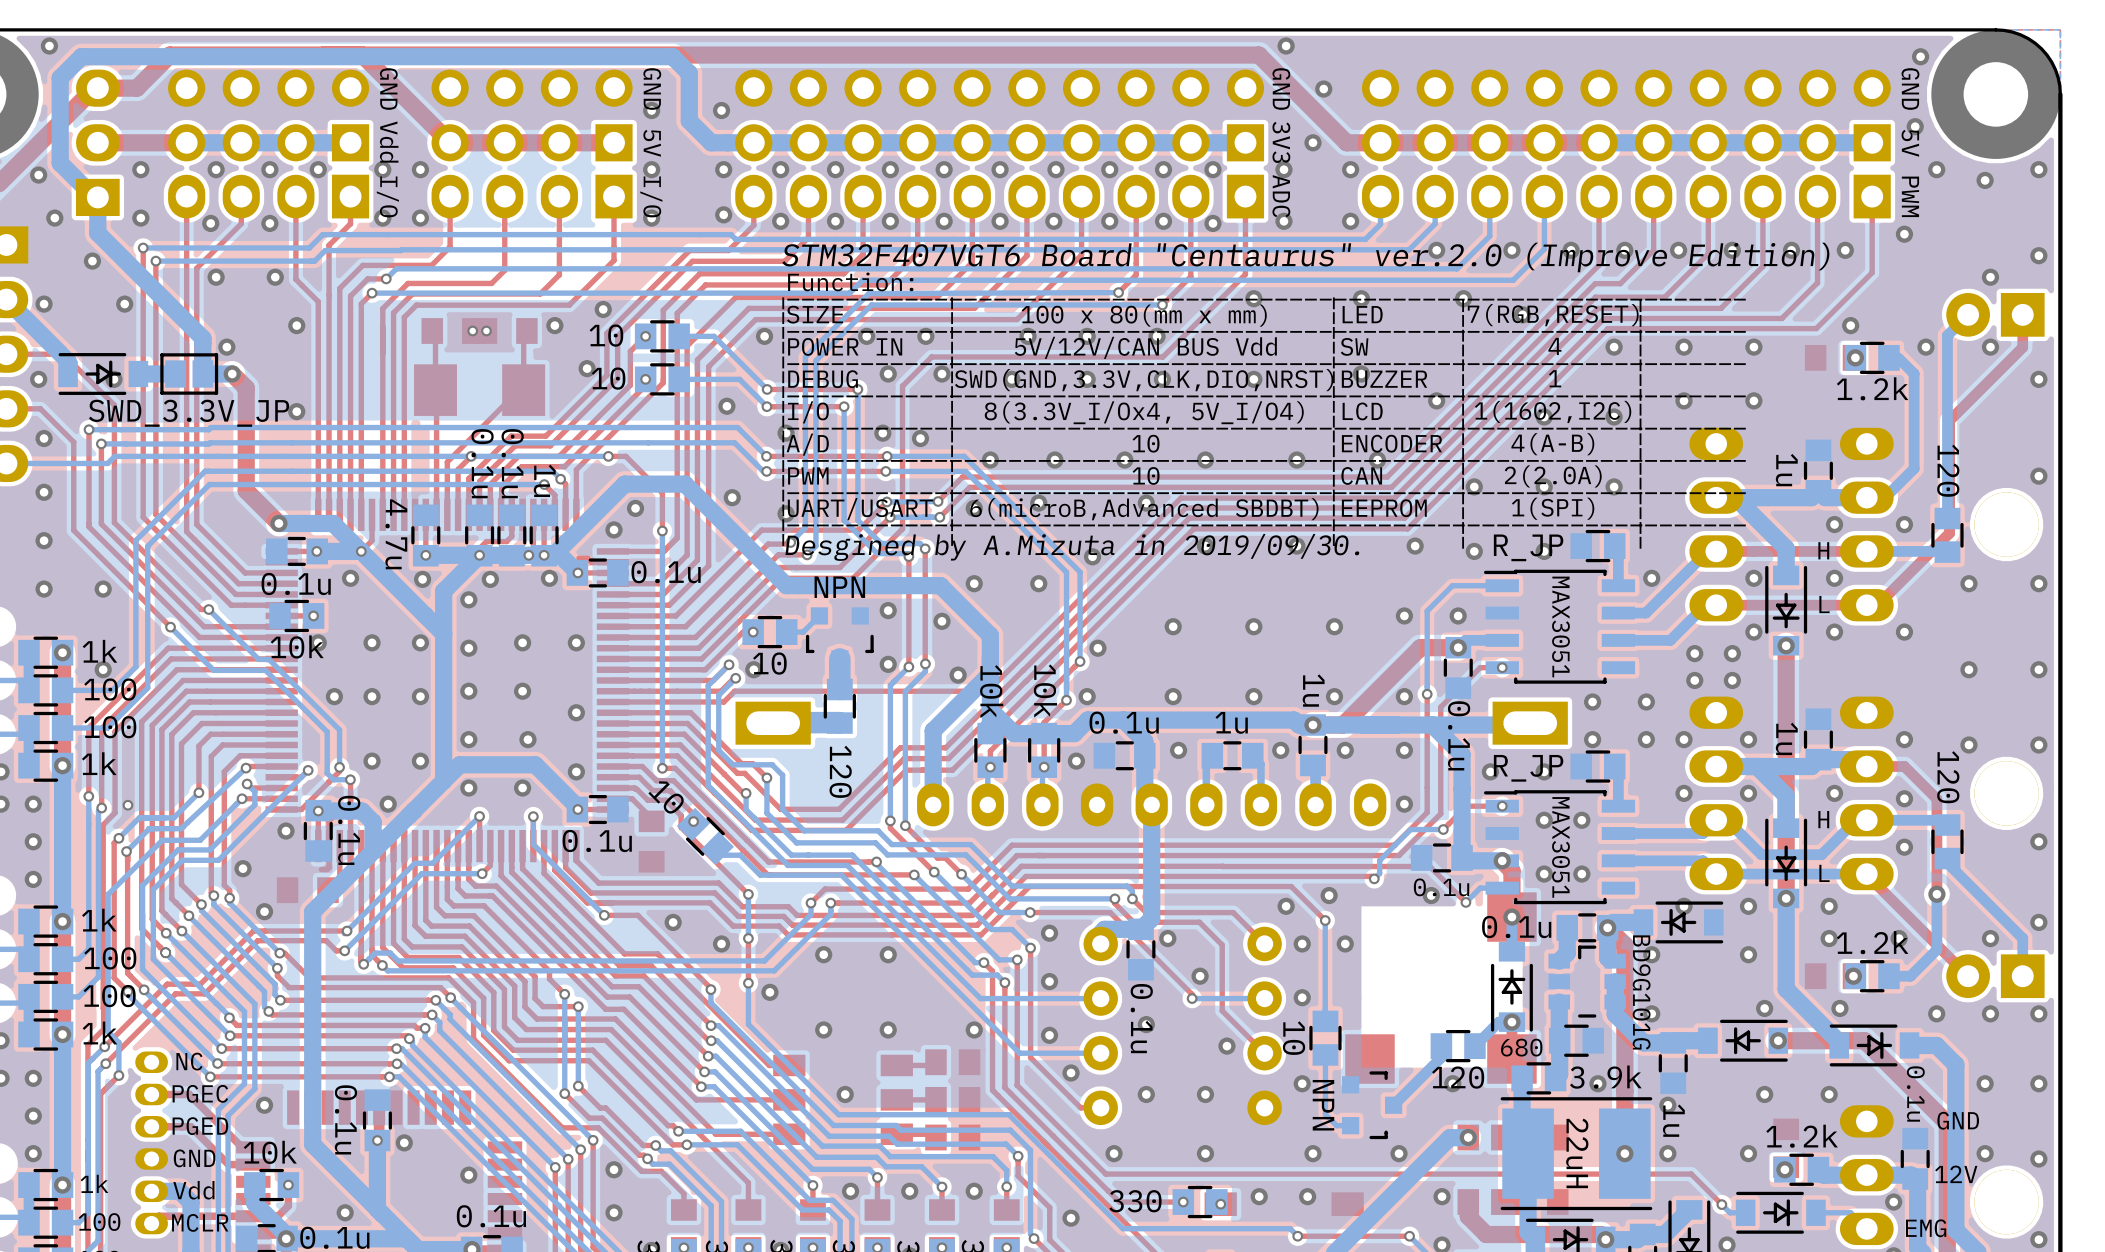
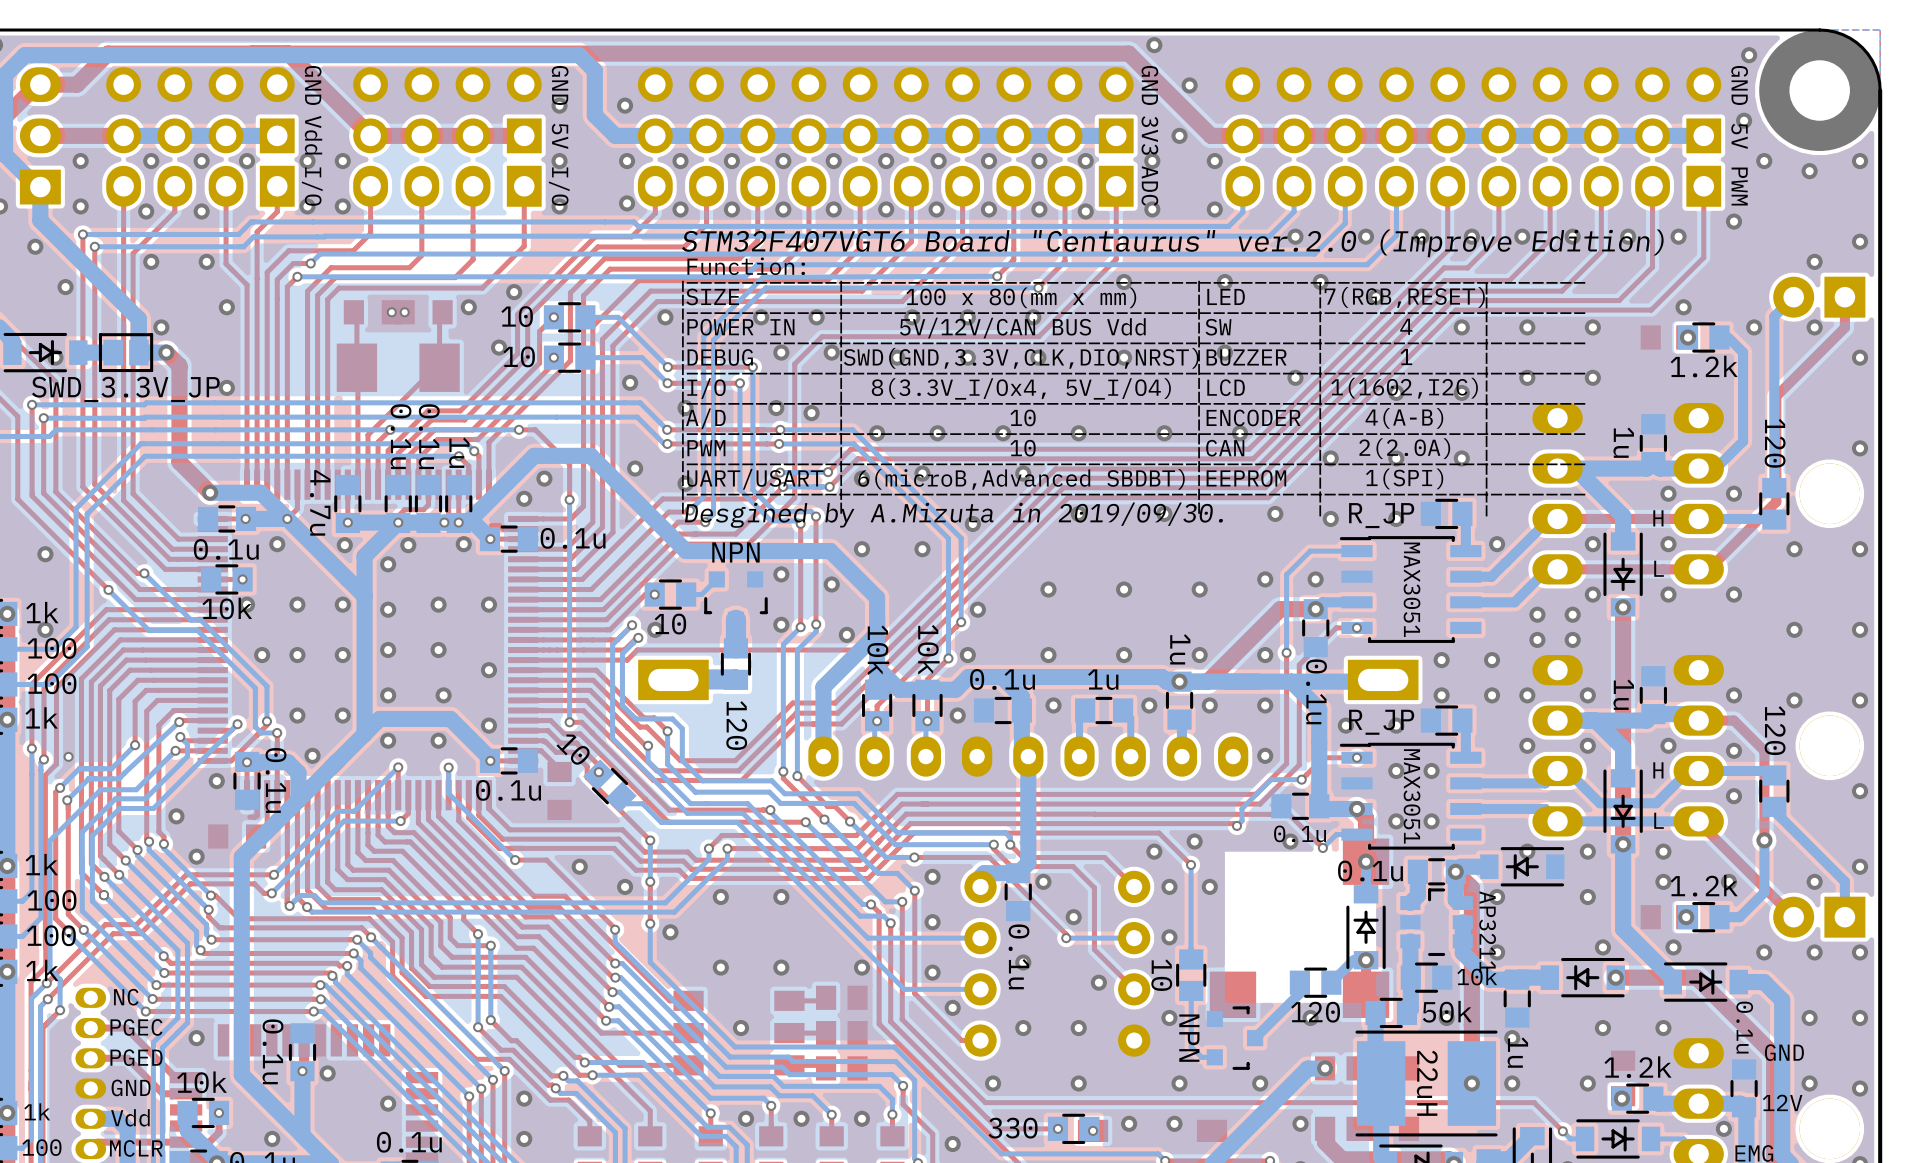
part value: BD9G101G (1641, 992) -> AP3211 (1487, 932)
part value: 680 (1521, 1047) -> 10k (1477, 976)
part value: 3.9k (1605, 1077) -> 50k (1447, 1011)

